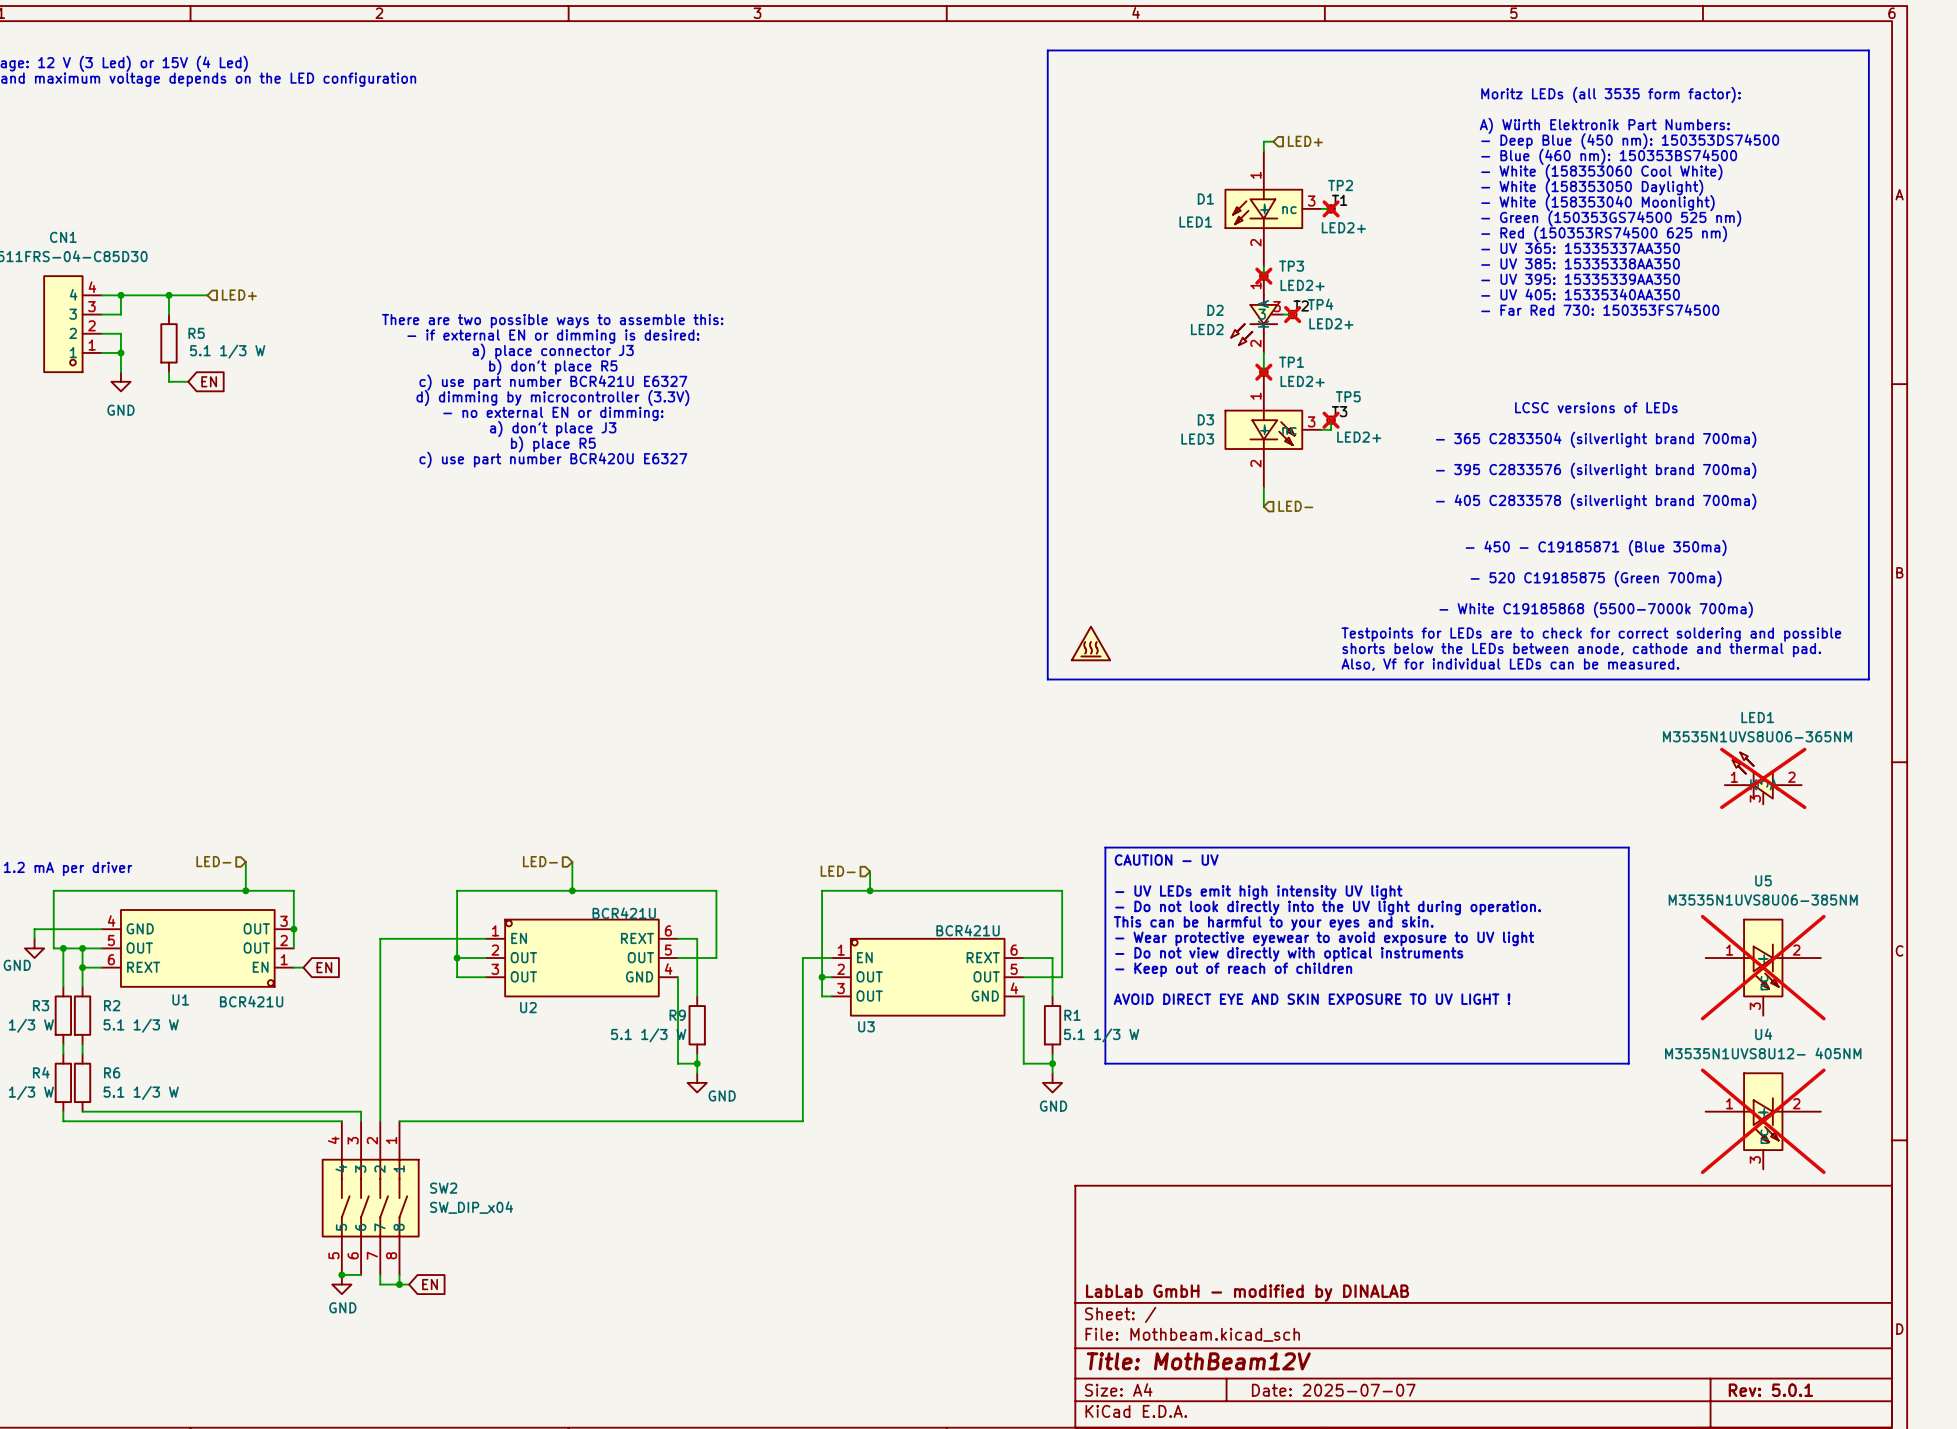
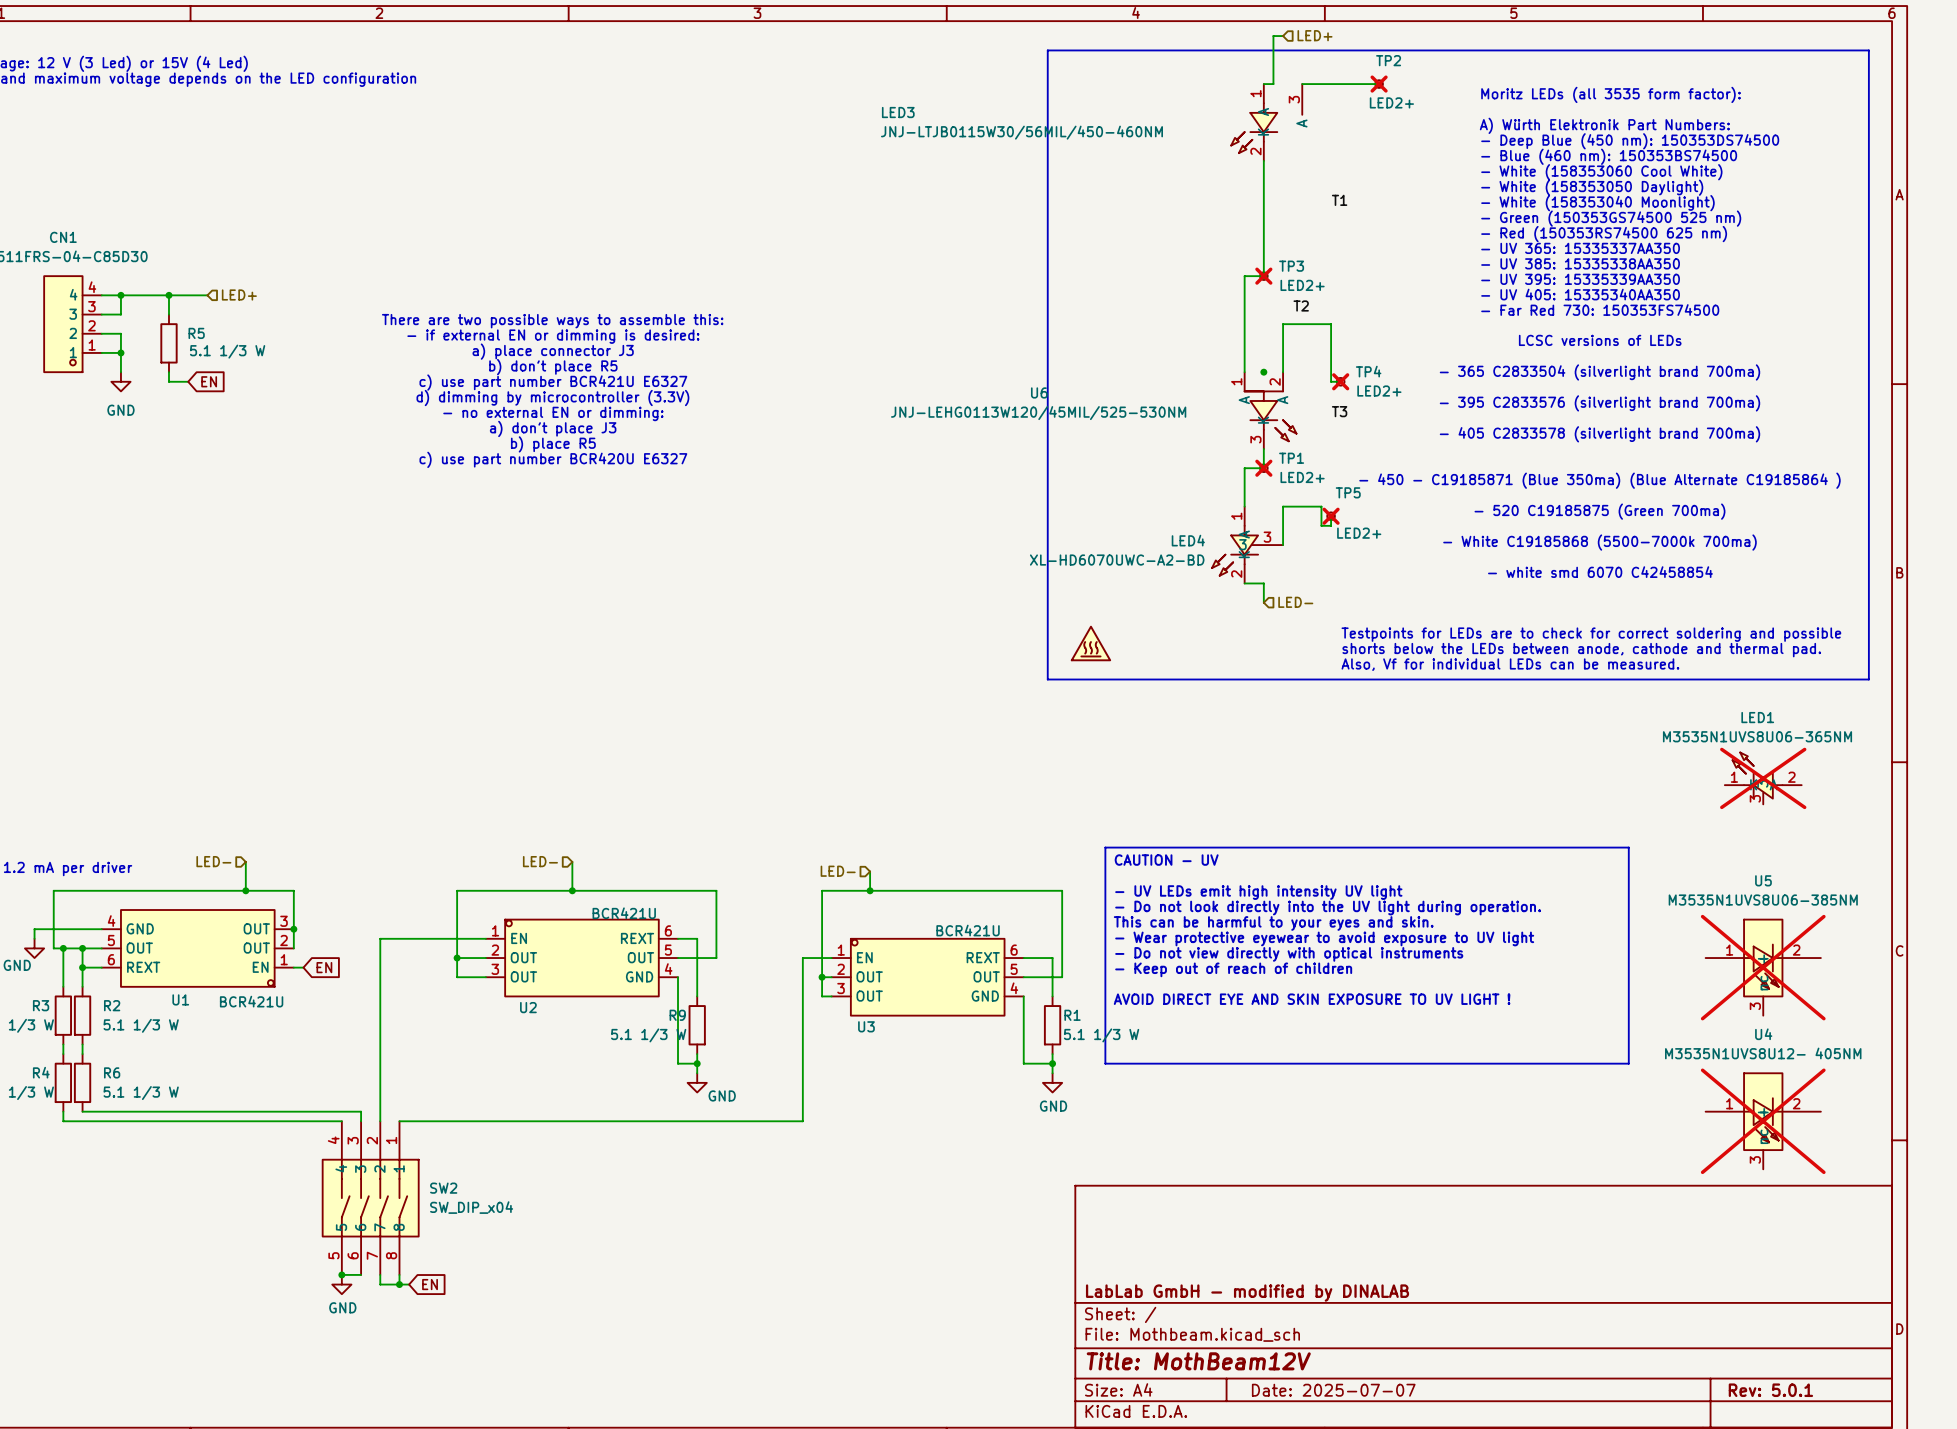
wire: none -> (1283, 36) (1273, 36) (1273, 84) (1263, 84)
wire: none -> (1302, 84) (1379, 84)
LED3: none -> JNJ-LTJB0115W30/56MIL/450-460NM (1266, 122)
hierarchical label position: LED+ (1305, 141) -> LED+ (1314, 35)
D1: LED1 (1273, 208) -> none
wire: (1321, 208) (1331, 208) -> none
TP2 position: (1331, 208) -> (1379, 84)
wire: none -> (1263, 276) (1244, 276) (1244, 372)
D2: LED2 (1257, 314) -> none
wire: (1283, 314) (1292, 314) -> none
TP4 position: (1292, 314) -> (1340, 381)
wire: (1263, 352) (1263, 372) -> none
TP1 position: (1263, 372) -> (1263, 468)
wire: none -> (1283, 372) (1283, 324) (1331, 324) (1331, 381) (1340, 381)
text position: LCSC versions of LEDs (1596, 407) -> LCSC versions of LEDs (1600, 340)
U6: none -> JNJ-LEHG0113W120/45MIL/525-530NM (1270, 410)
wire: (1331, 420) (1331, 429) (1321, 429) -> none
TP5 position: (1331, 420) -> (1331, 516)
D3: LED3 (1273, 429) -> none
text position: - 365 C2833504 (silverlight brand 700ma) (1596, 439) -> - 365 C2833504 (silverlight brand 700ma) (1599, 372)
wire: none -> (1263, 449) (1263, 468) (1244, 468) (1244, 506)
text position: - 395 C2833576 (silverlight brand 700ma) (1596, 470) -> - 395 C2833576 (silverlight brand 700ma) (1599, 403)
text: none -> - 450 - C19185871 (Blue 350ma) (Blue Alternate C19185864 ) (1599, 480)
wire: (1263, 487) (1263, 506) -> none
text position: - 405 C2833578 (silverlight brand 700ma) (1596, 501) -> - 405 C2833578 (silverlight brand 700ma) (1599, 434)
hierarchical label position: LED- (1295, 506) -> LED- (1295, 602)
wire: none -> (1331, 516) (1331, 525) (1321, 525) (1321, 506) (1283, 506) (1283, 545)
LED4: none -> XL-HD6070UWC-A2-BD (1247, 545)
text: - 450 - C19185871 (Blue 350ma) (1596, 548) -> none
text: none -> - white smd 6070 C42458854 (1600, 572)
text position: - 520 C19185875 (Green 700ma) (1596, 578) -> - 520 C19185875 (Green 700ma) (1599, 511)
wire: none -> (1244, 583) (1263, 583) (1263, 602)
text position: - White C19185868 (5500-7000k 700ma) (1596, 609) -> - White C19185868 (5500-7000k 700ma) (1599, 542)

